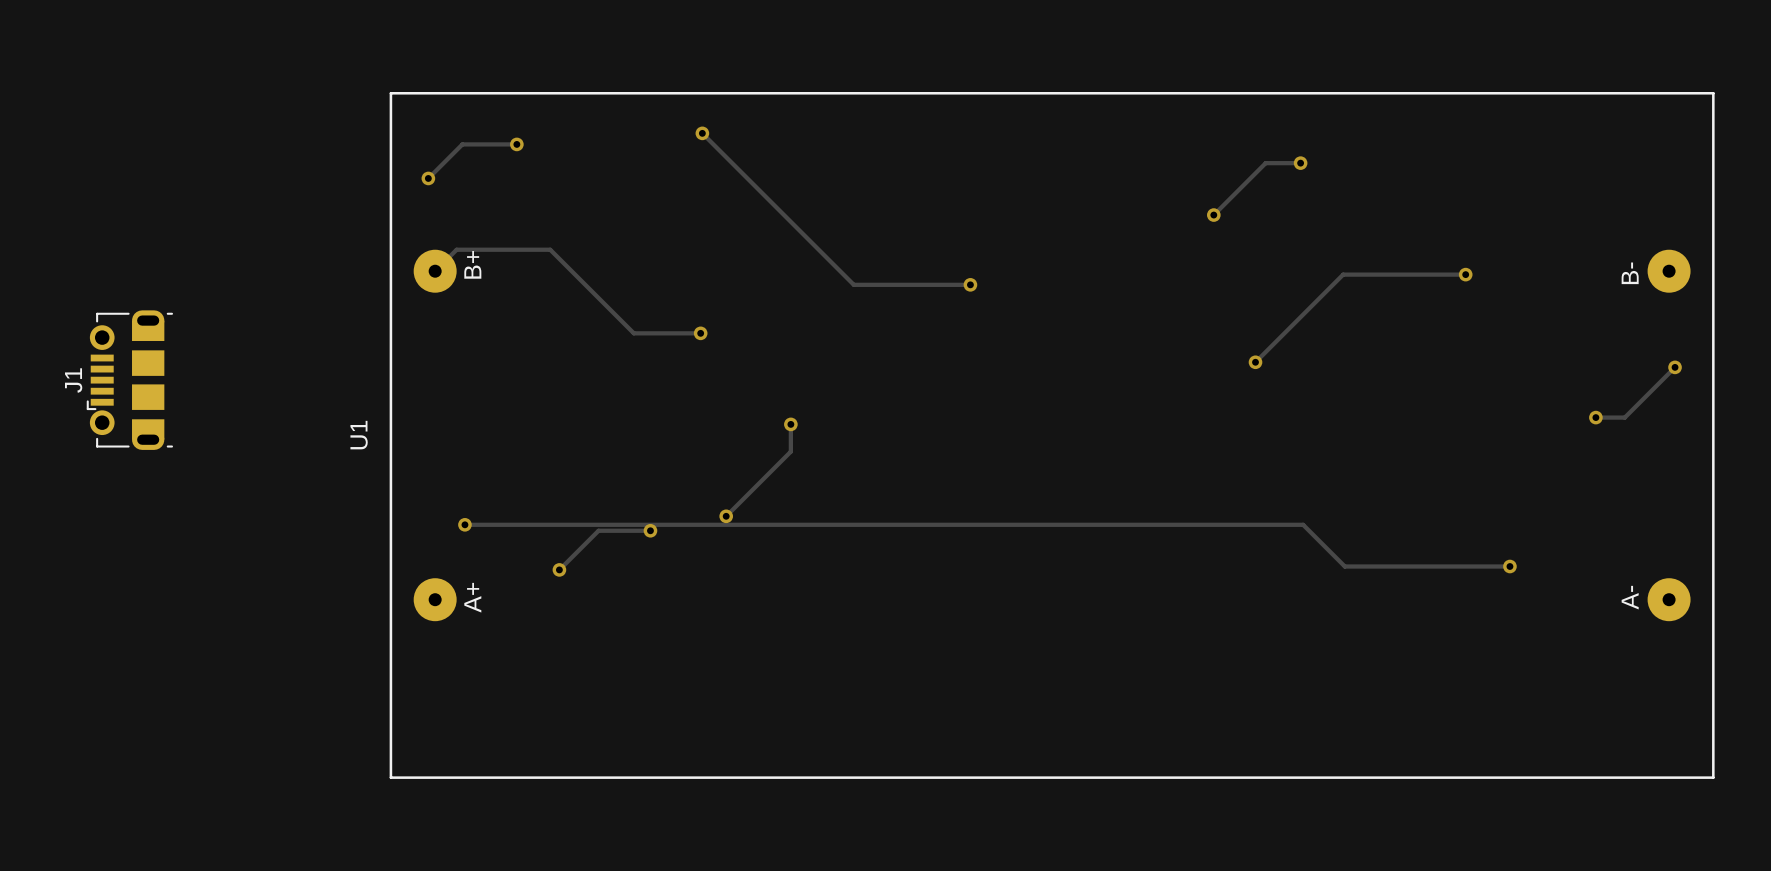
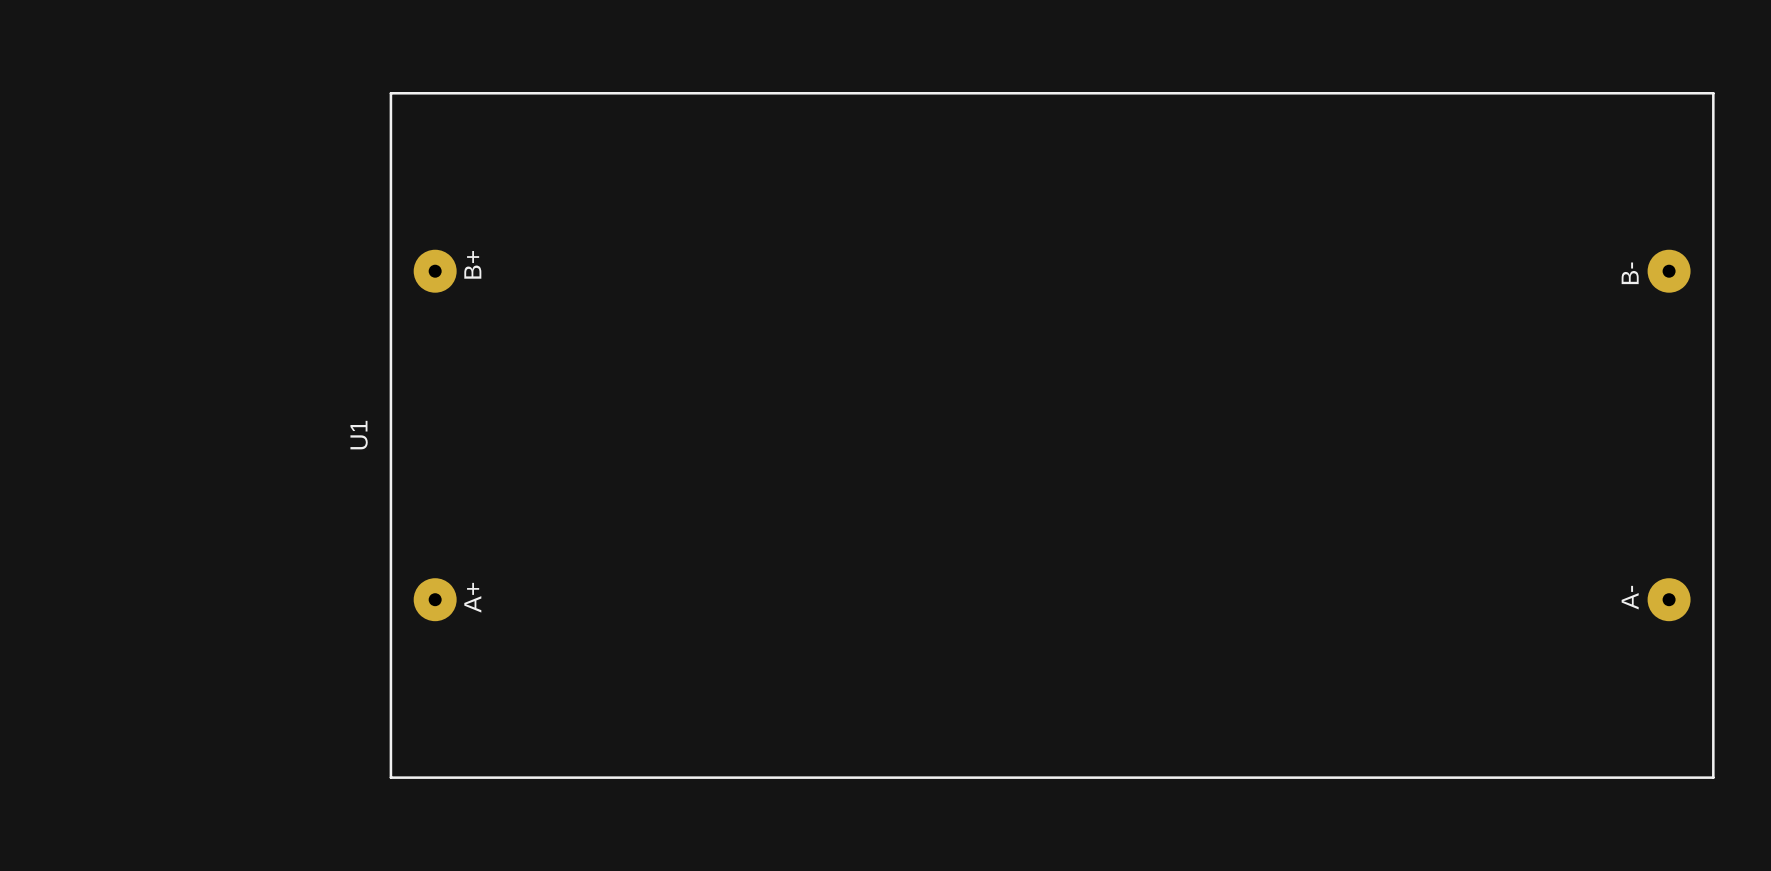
track: (702, 133) (853, 284) (970, 284) -> none
via: (702, 133) -> none
track: (516, 144) (462, 144) (428, 178) -> none
via: (516, 144) -> none
track: (1300, 163) (1265, 163) (1213, 215) -> none
via: (1300, 163) -> none
via: (428, 178) -> none
via: (1213, 215) -> none
track: (435, 271) (456, 249) (550, 249) (633, 333) (700, 333) -> none
track: (1465, 274) (1343, 274) (1255, 362) -> none
via: (1465, 274) -> none
via: (970, 284) -> none
via: (700, 333) -> none
via: (1255, 362) -> none
track: (1675, 367) (1624, 417) (1595, 417) -> none
via: (1675, 367) -> none
J1: (129, 380) -> none
via: (1595, 417) -> none
track: (790, 424) (790, 451) (726, 516) -> none
via: (790, 424) -> none
via: (726, 516) -> none
track: (464, 524) (1303, 524) (1344, 566) (1509, 566) -> none
via: (464, 524) -> none
track: (650, 530) (598, 530) (559, 569) -> none
via: (650, 530) -> none
via: (1509, 566) -> none
via: (559, 569) -> none

